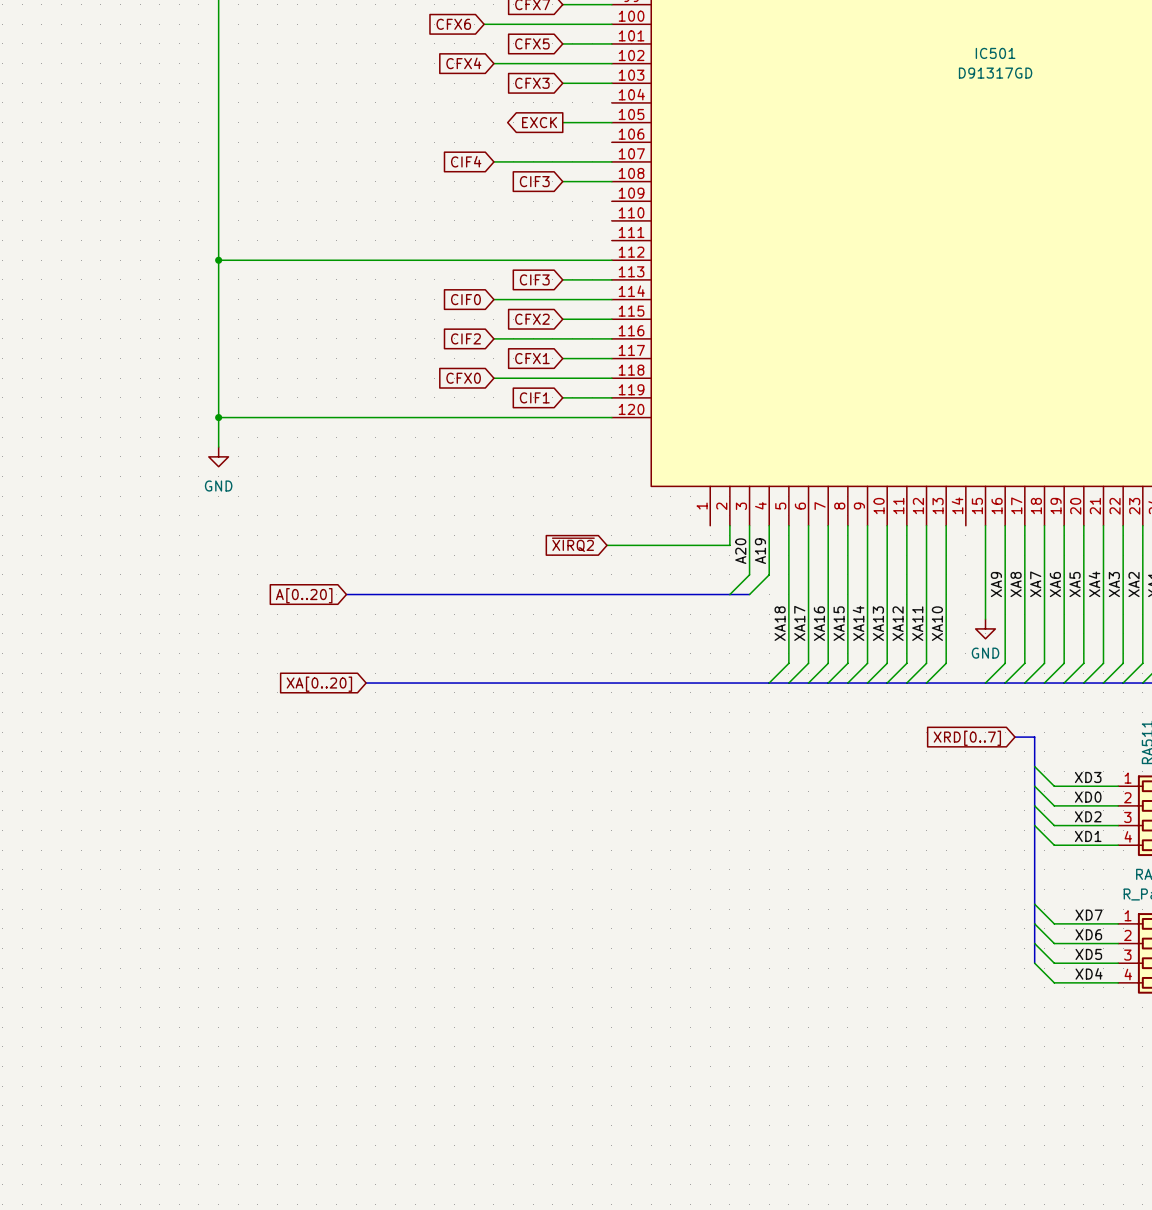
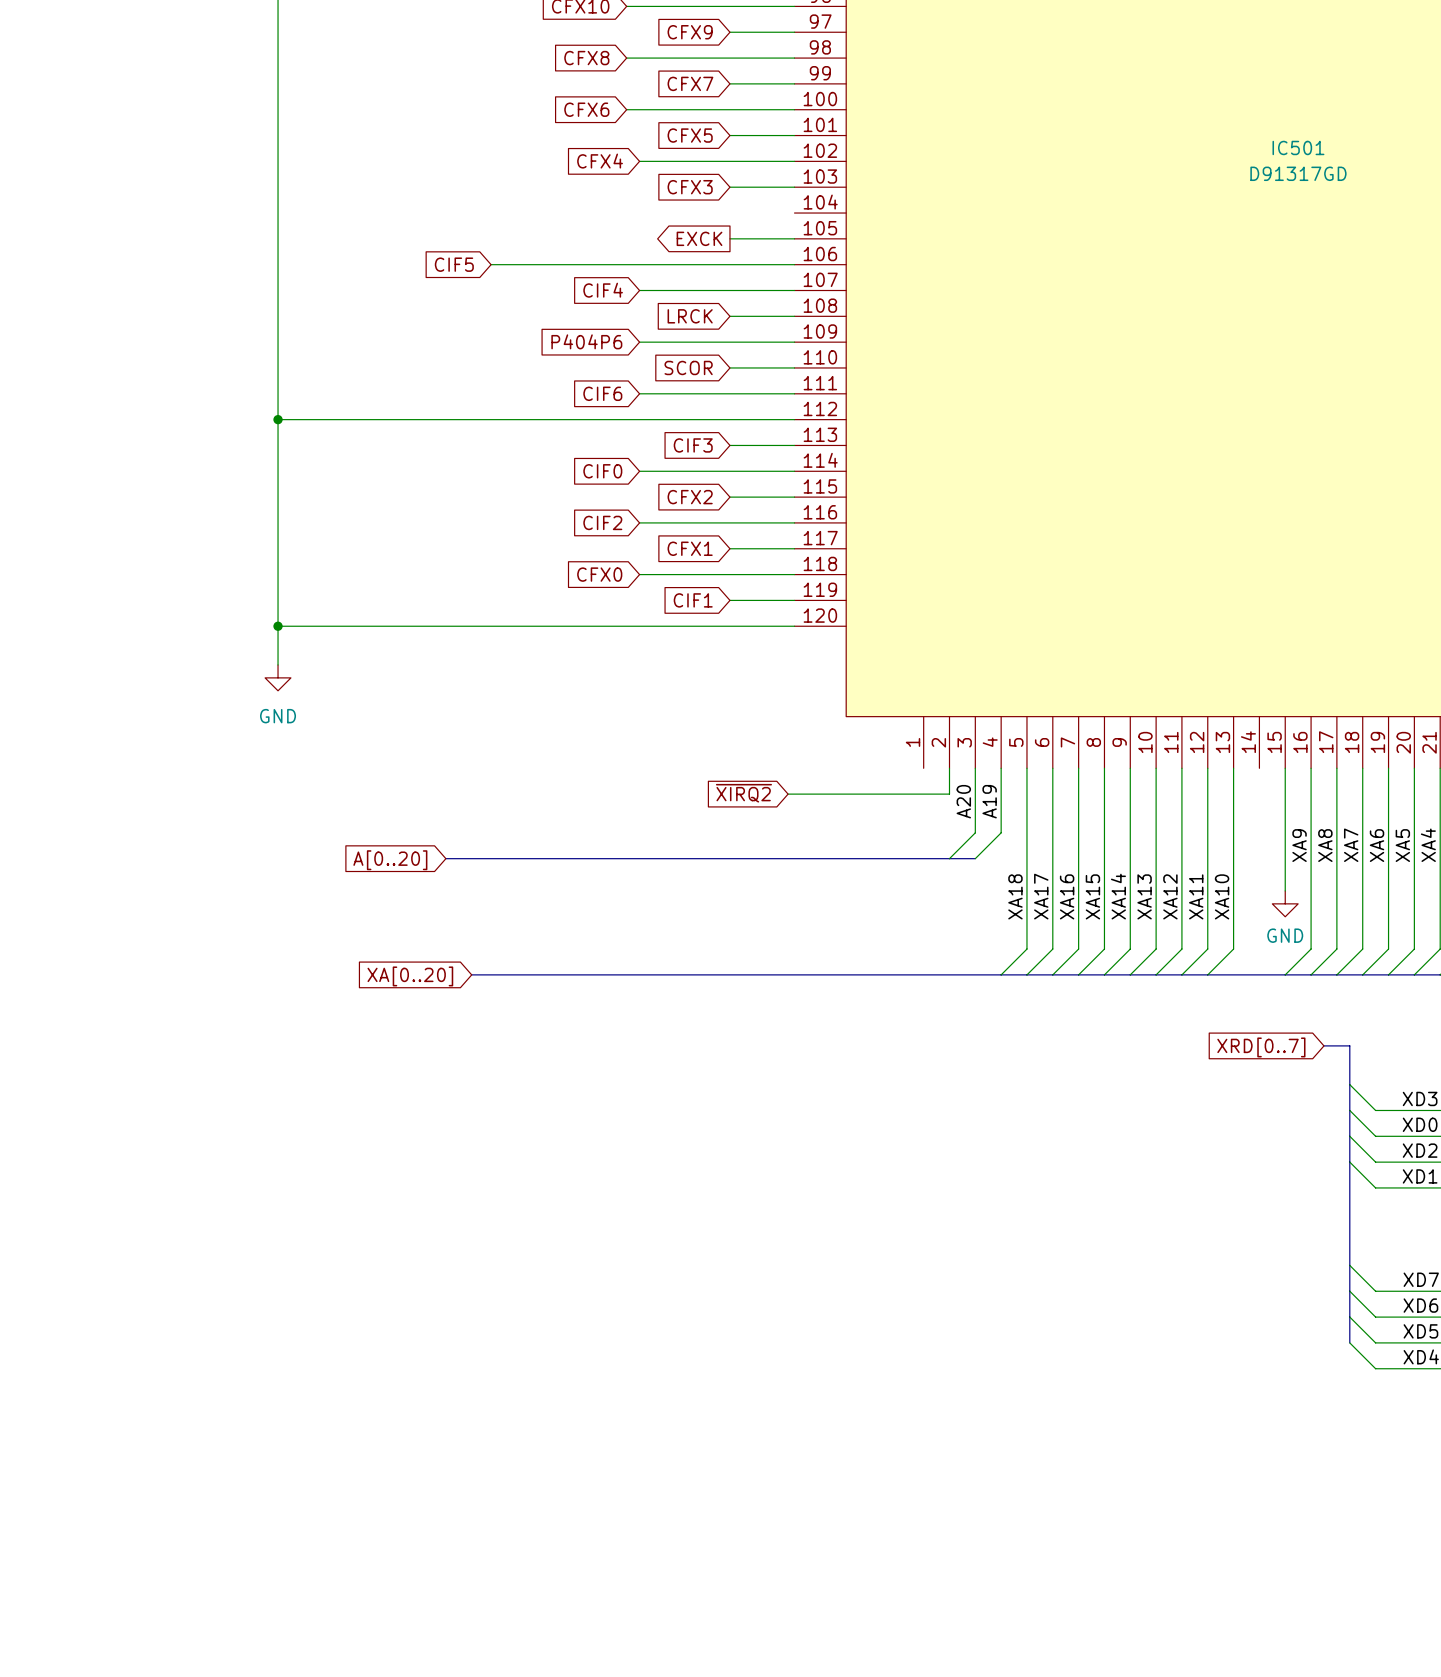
global label: none -> CIF5 (454, 264)
wire: none -> (491, 264) (794, 264)
global label: CIF3 (534, 181) -> LRCK (690, 316)
global label: none -> P404P6 (586, 341)
wire: none -> (639, 342) (794, 342)
global label: none -> SCOR (688, 367)
wire: none -> (729, 367) (794, 367)
global label: none -> CIF6 (602, 393)
wire: none -> (639, 393) (794, 393)

